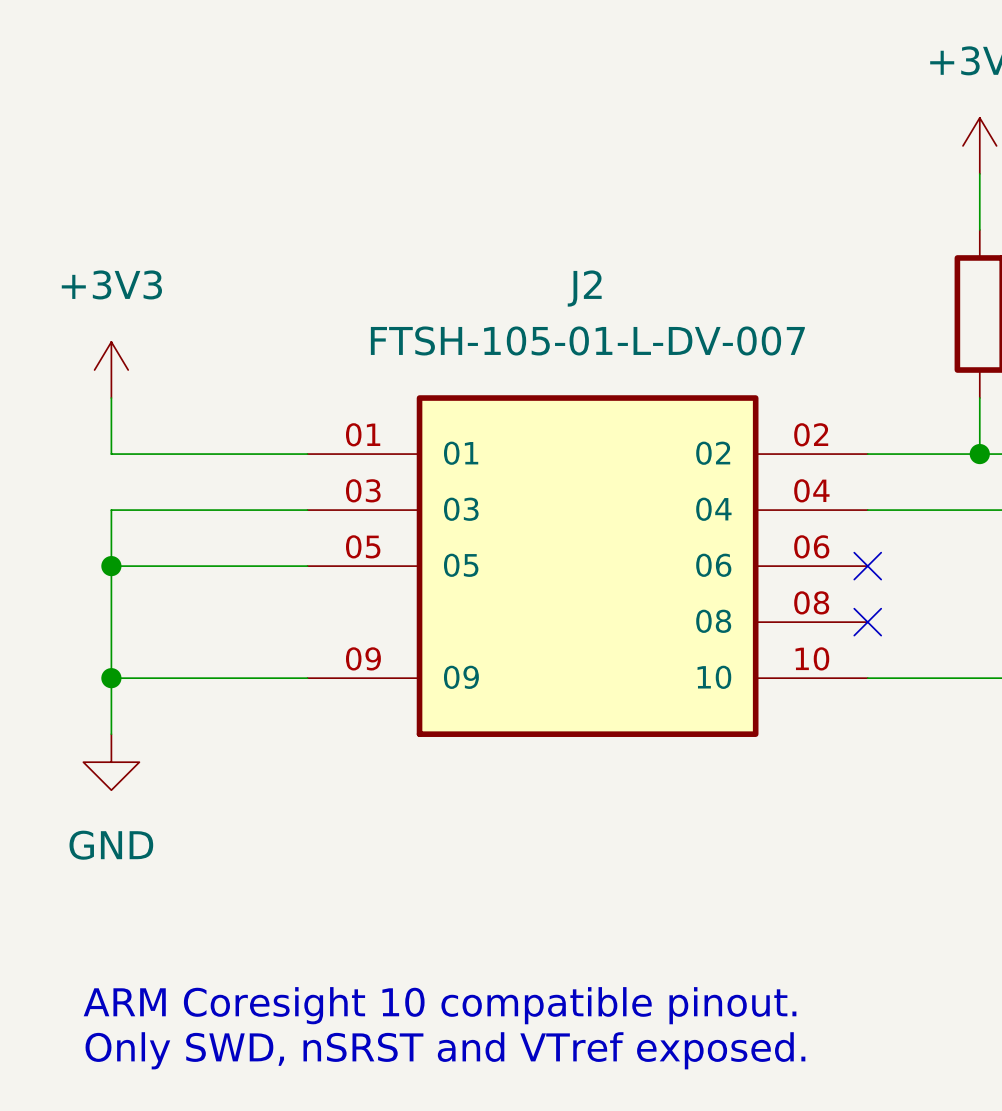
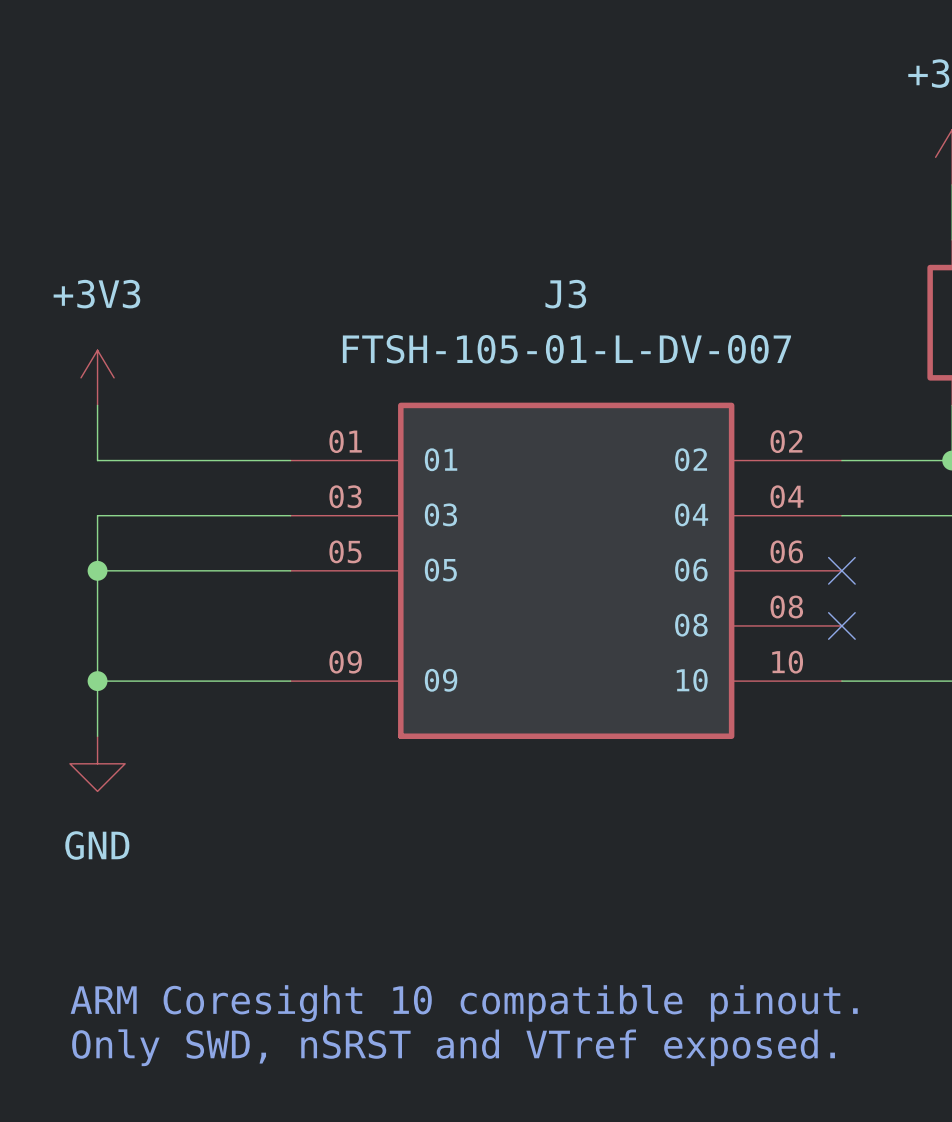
J2 name: J2 (584, 288) -> J3 (565, 294)

